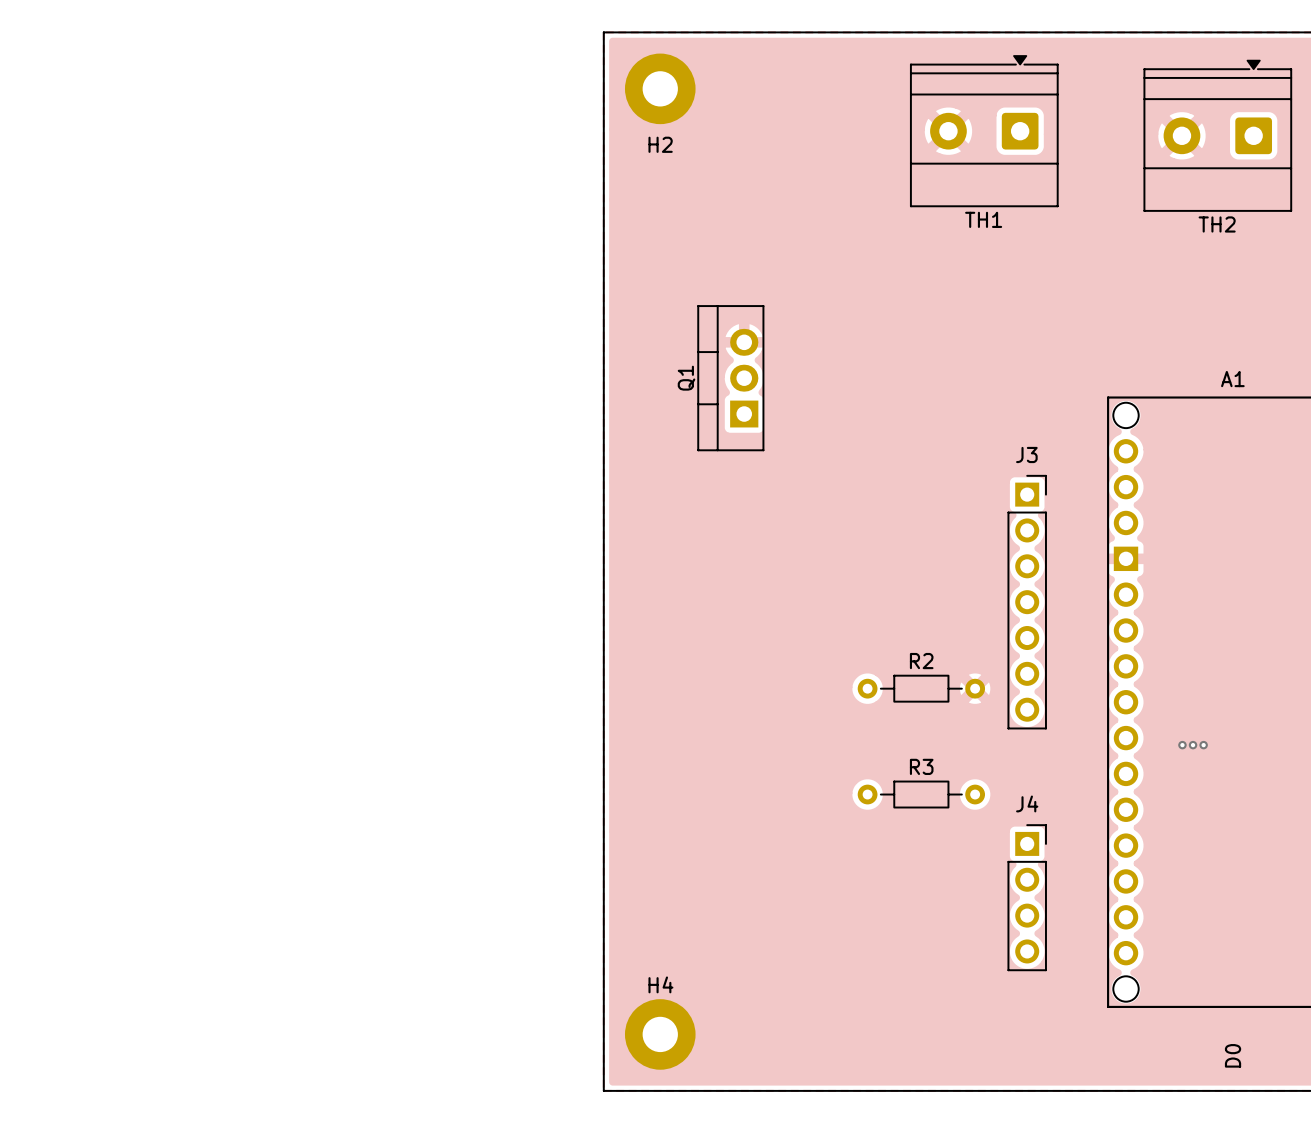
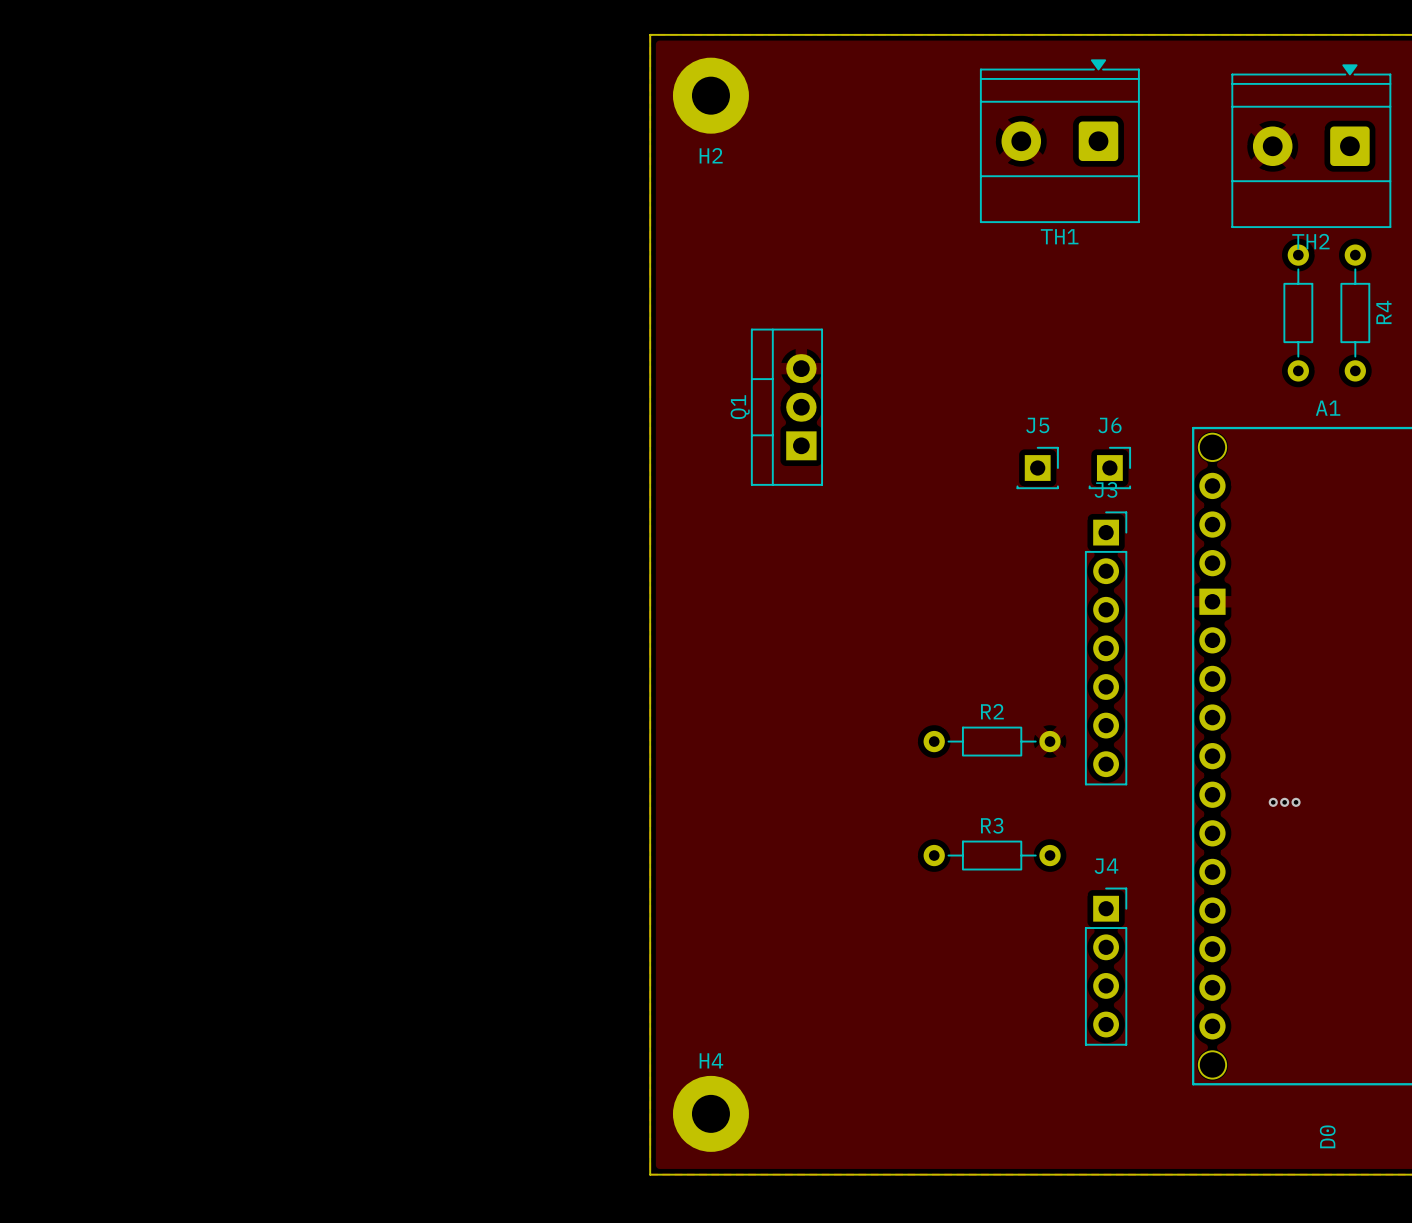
part: none -> (1298, 312)
R4: none -> (1355, 312)
J5: none -> (1037, 468)
J6: none -> (1109, 468)

